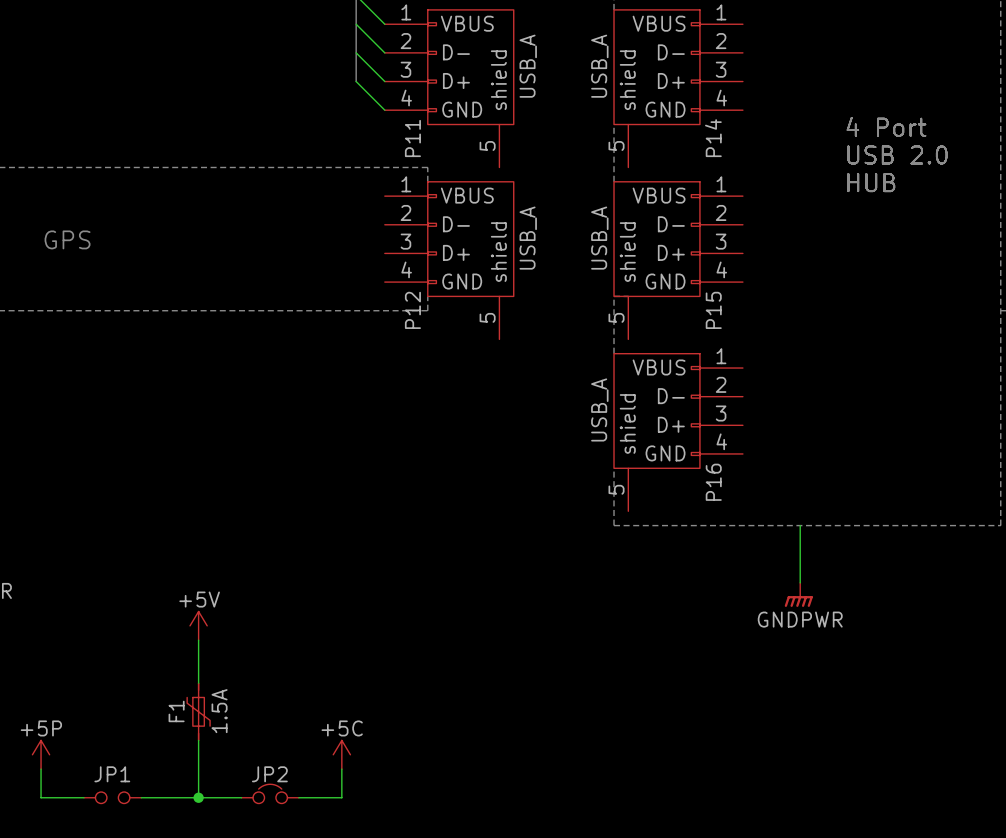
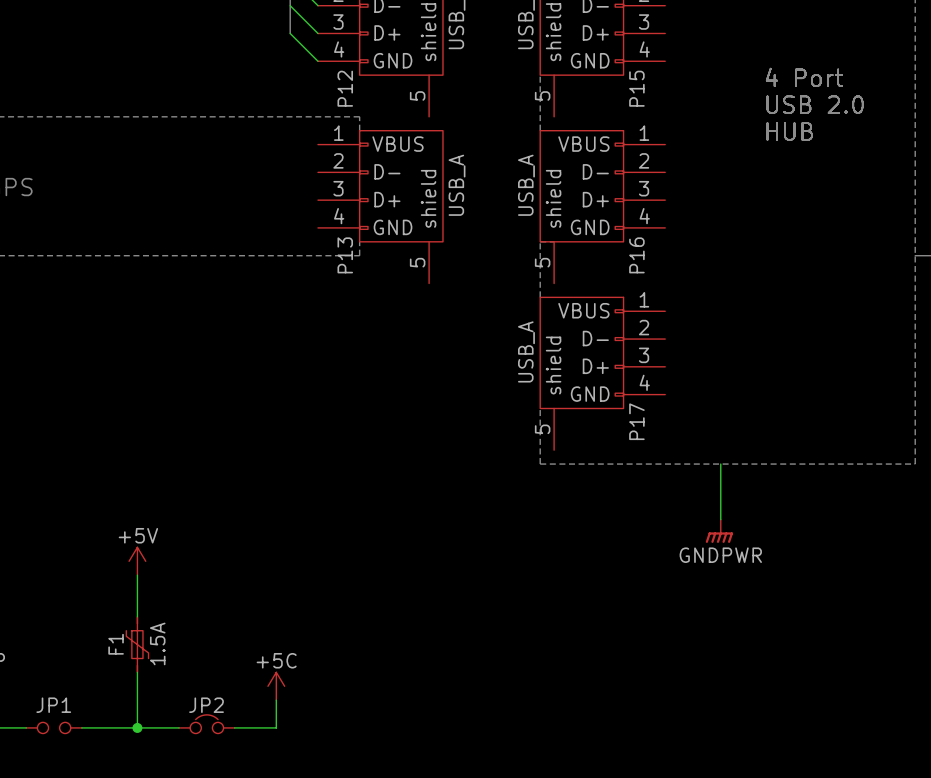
P11 name: P11 (412, 138) -> P12 (345, 88)
P14 name: P14 (713, 138) -> P15 (636, 88)
P12 name: P12 (412, 310) -> P13 (345, 255)
P15 name: P15 (713, 310) -> P16 (636, 255)
P16 name: P16 (713, 482) -> P17 (636, 421)

